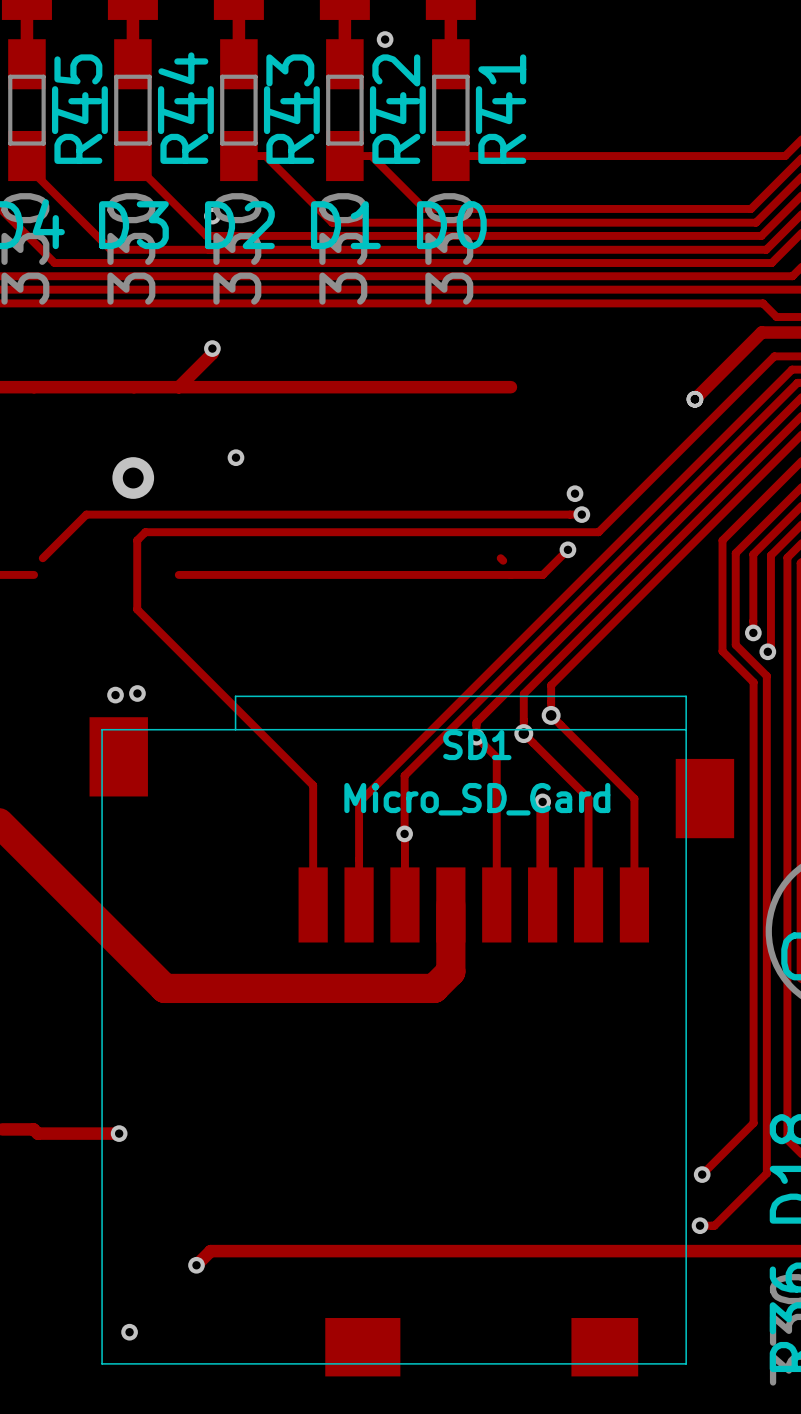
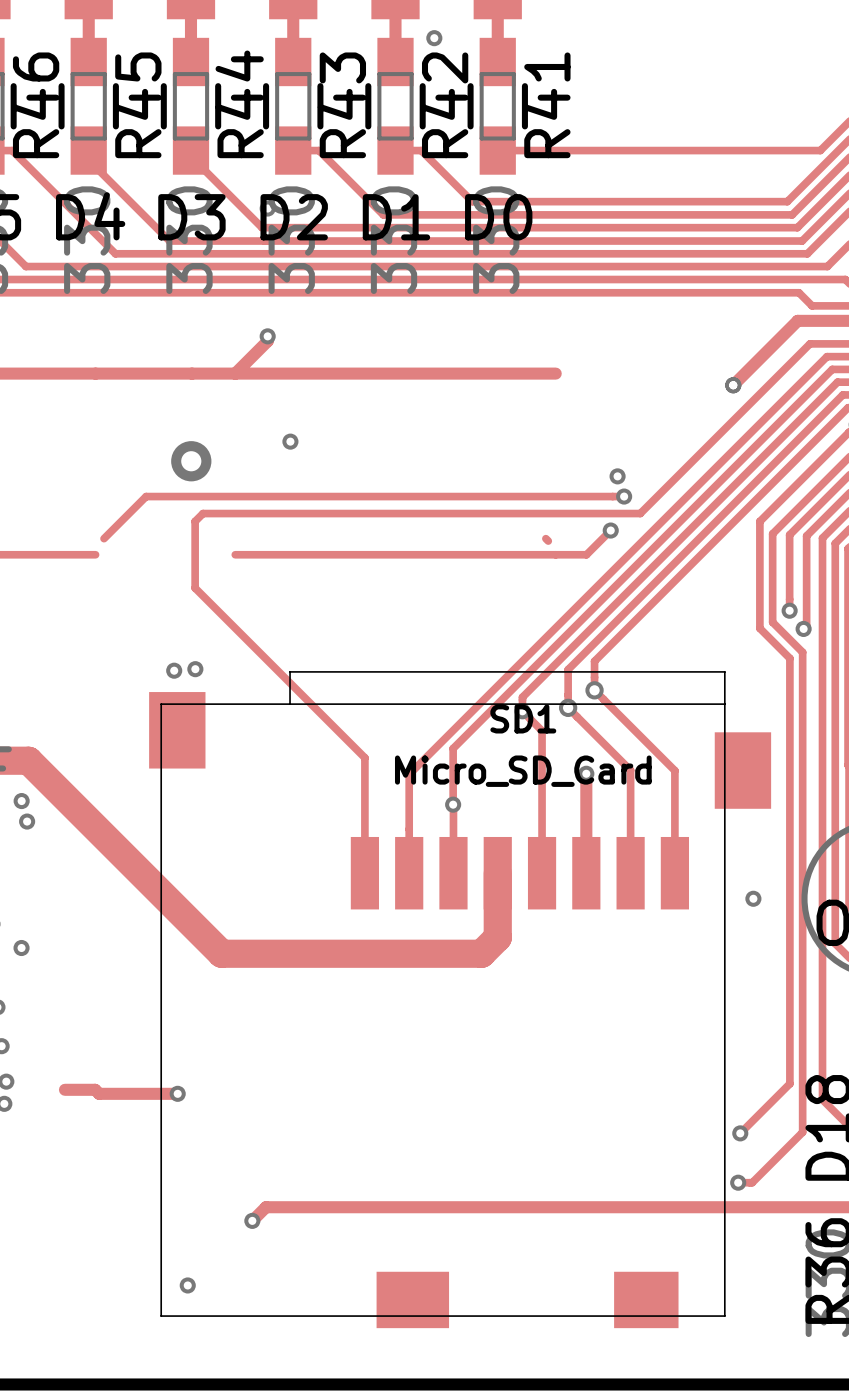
via: none -> (753, 898)

